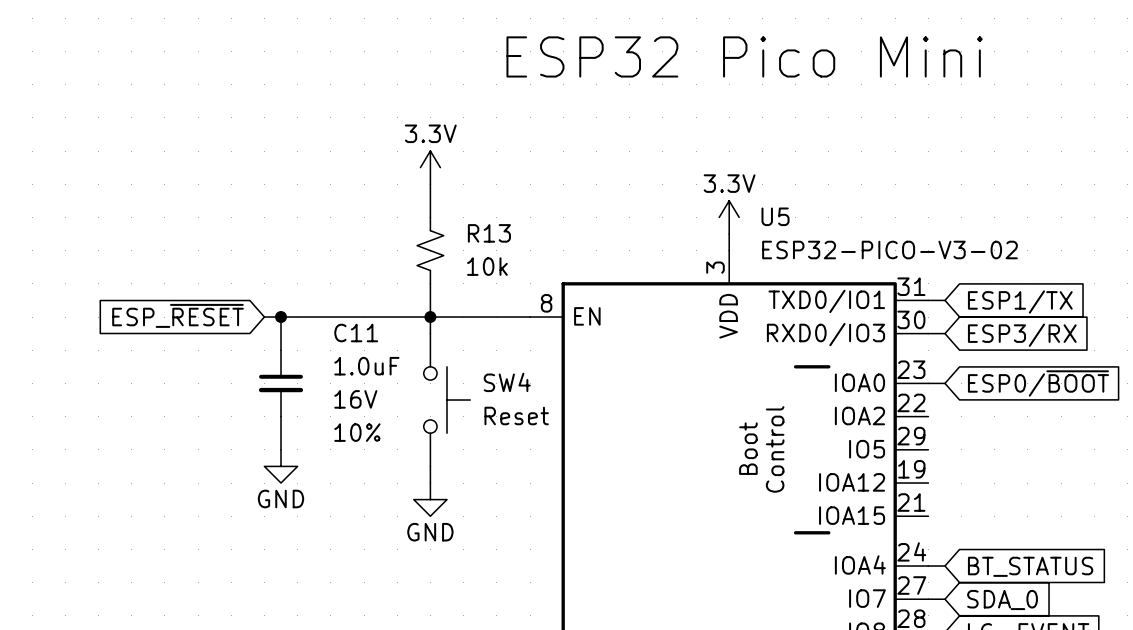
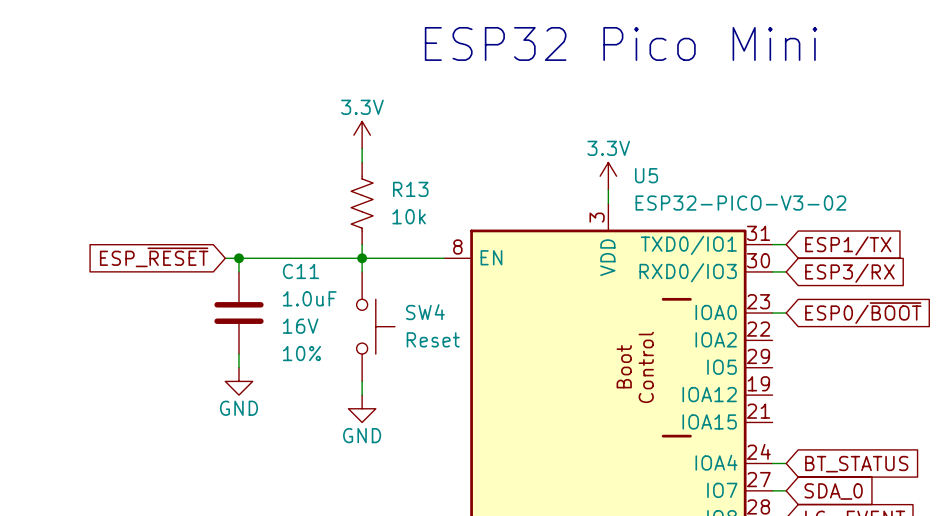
R13 symbol: [417, 217, 444, 284] -> [351, 162, 374, 245]
C11 symbol: [258, 350, 304, 417] -> [214, 271, 264, 355]

